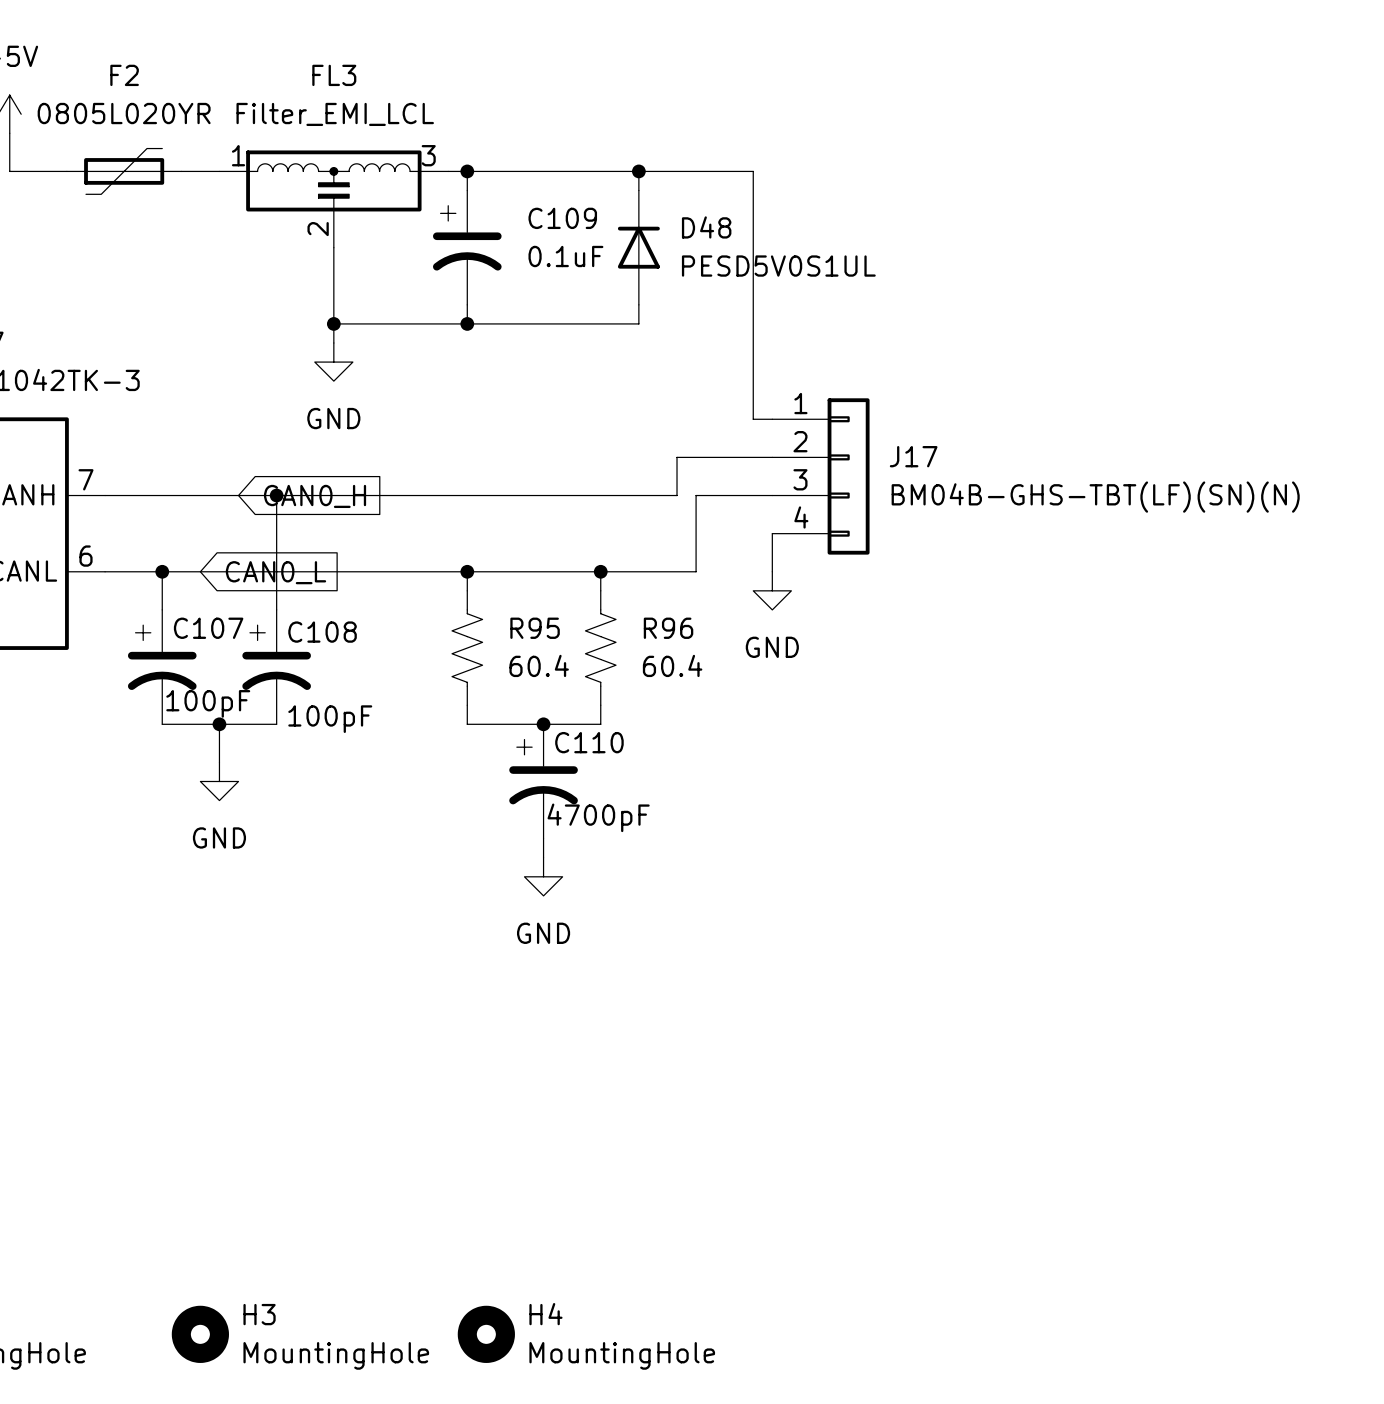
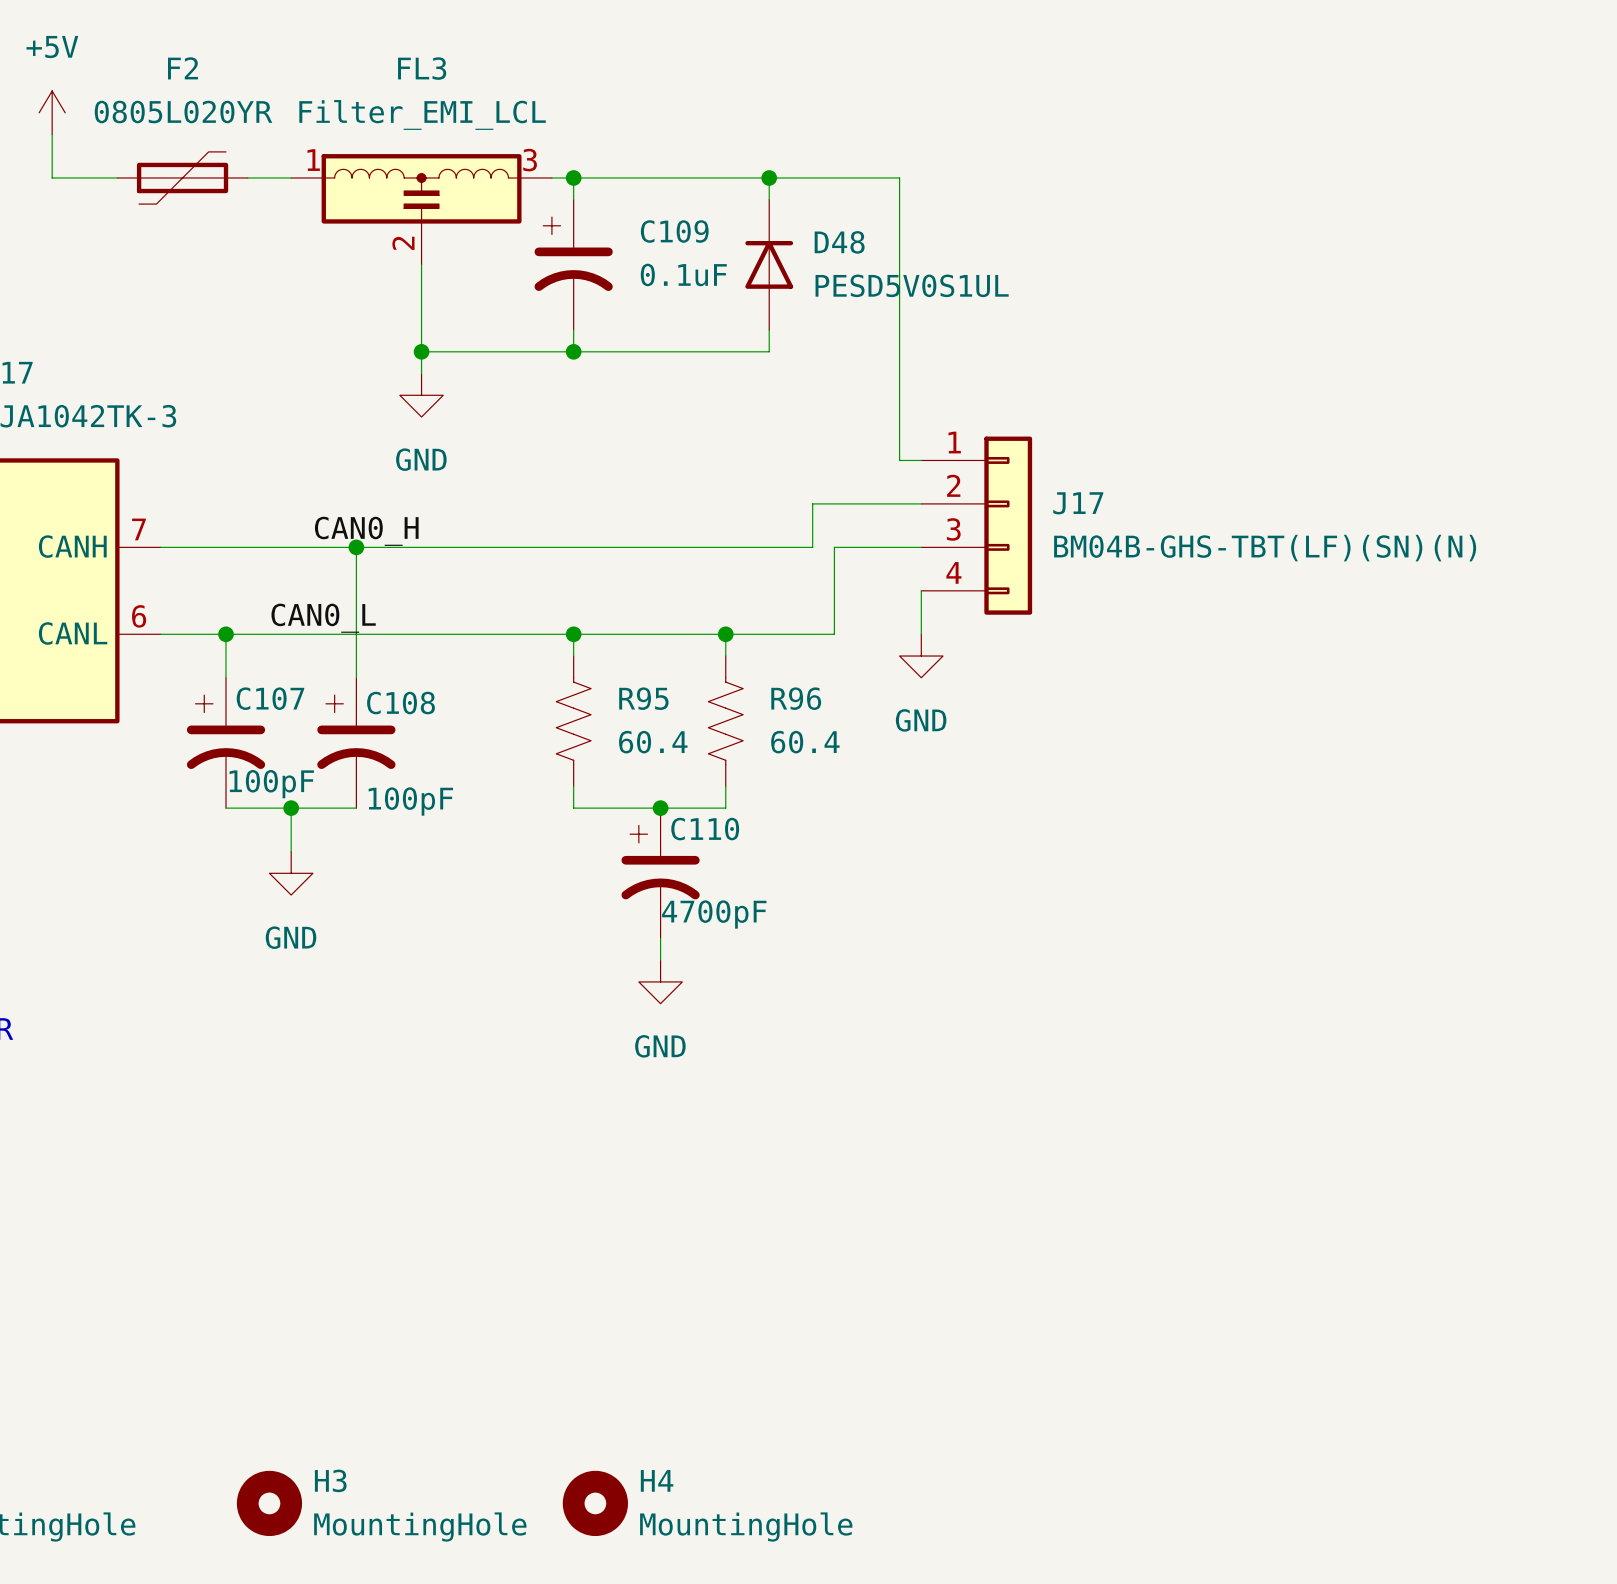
label: none -> CAN0_H (366, 531)
global label: CAN0_H (315, 496) -> none
label: none -> CAN0_L (323, 618)
global label: CAN0_L (276, 572) -> none

